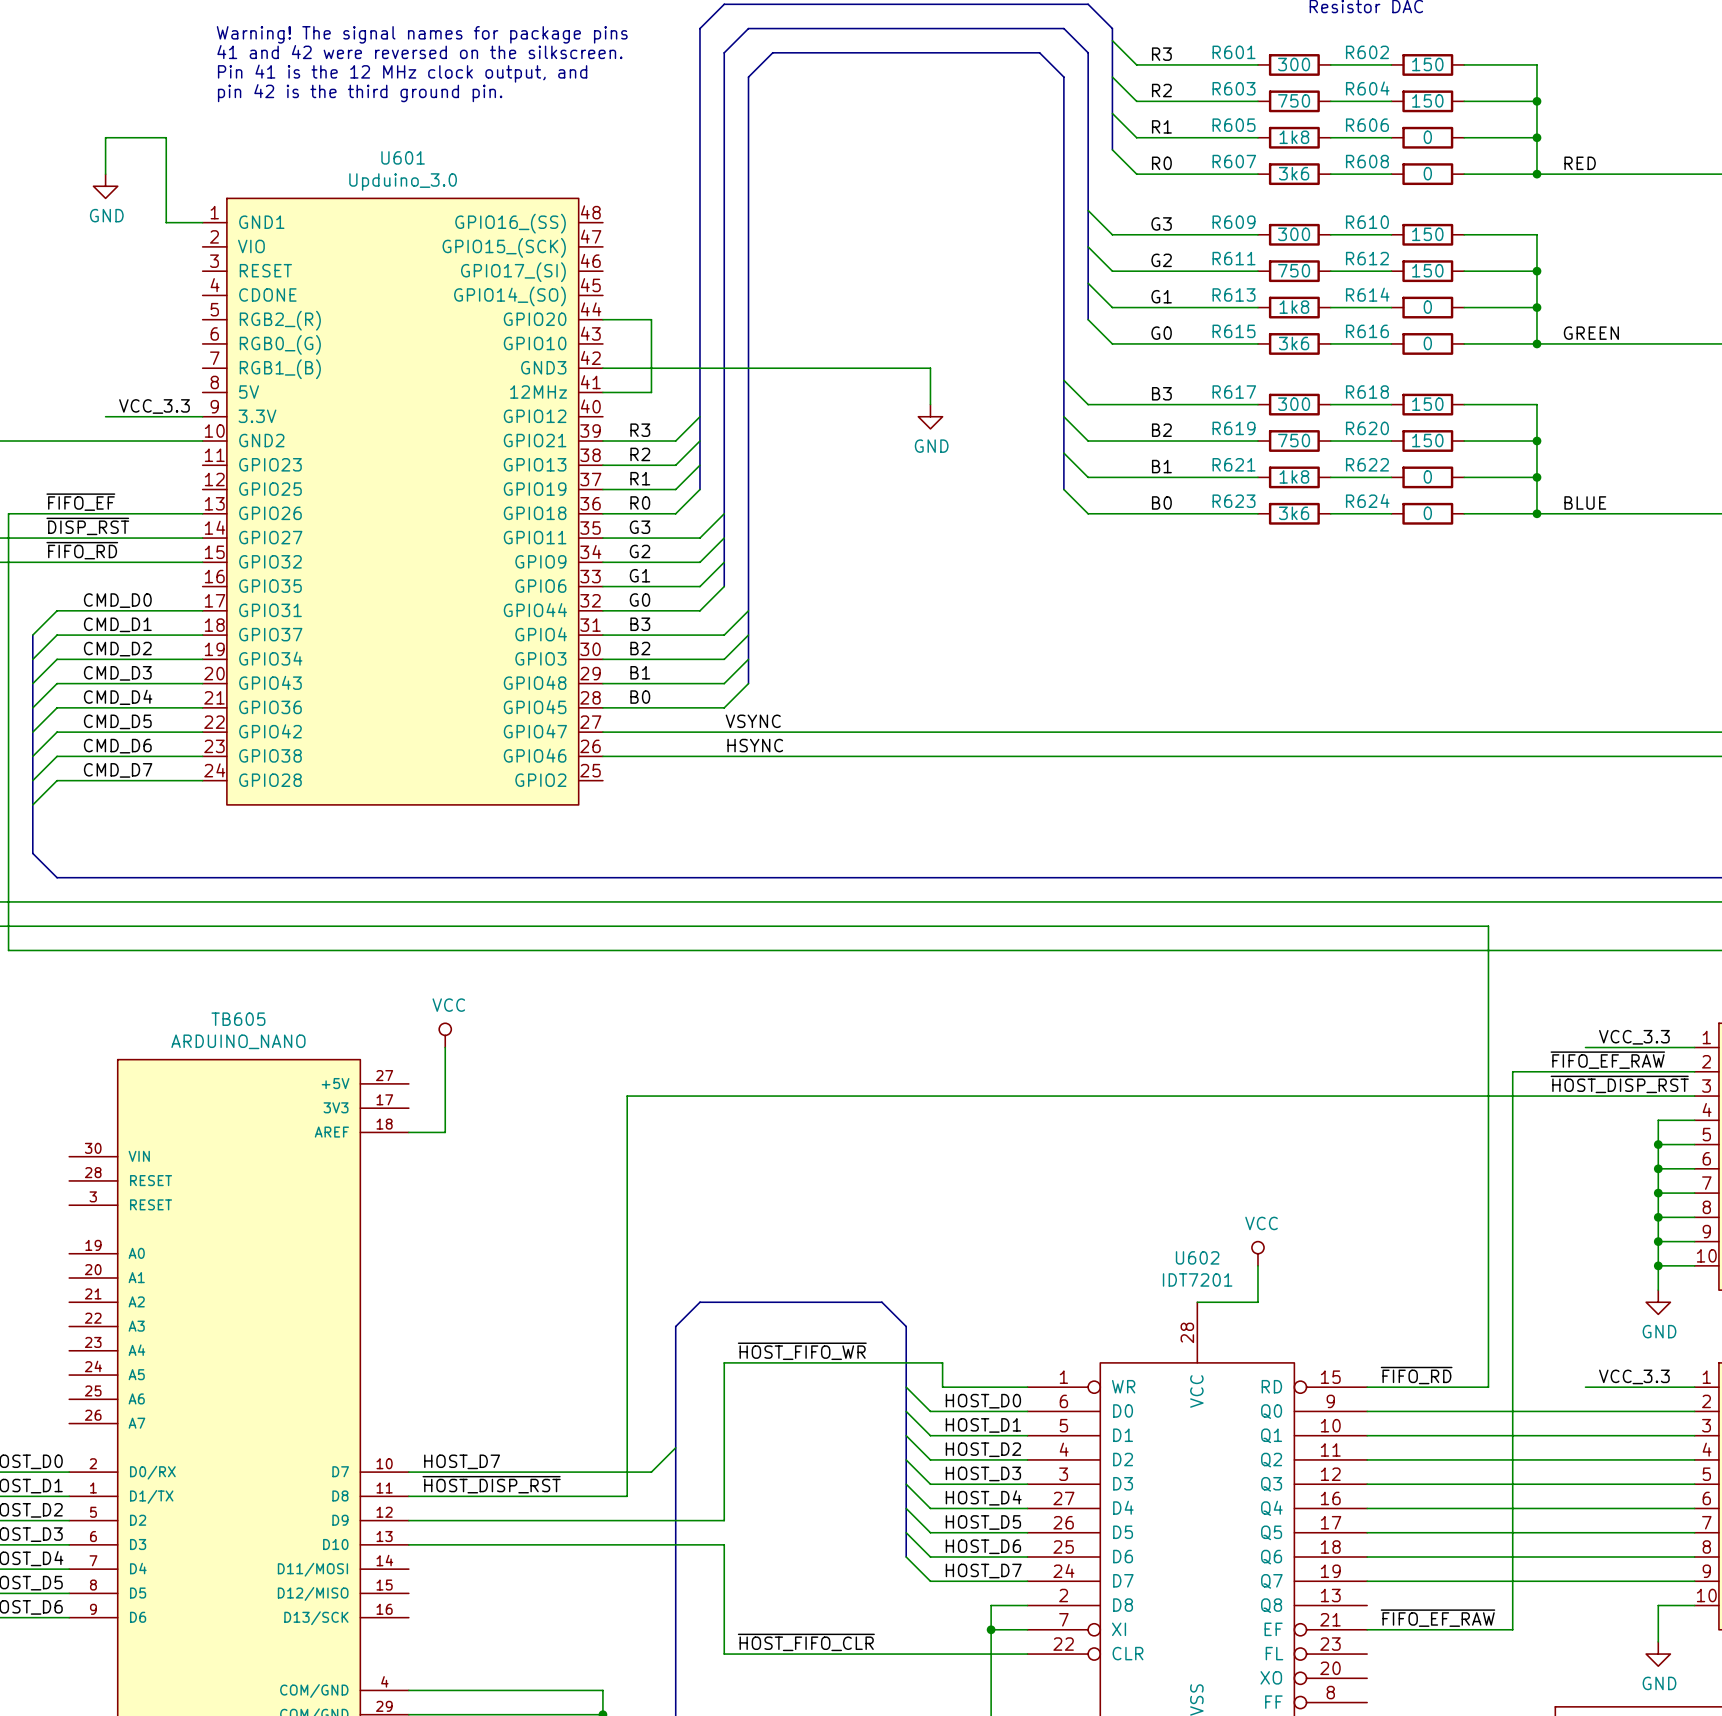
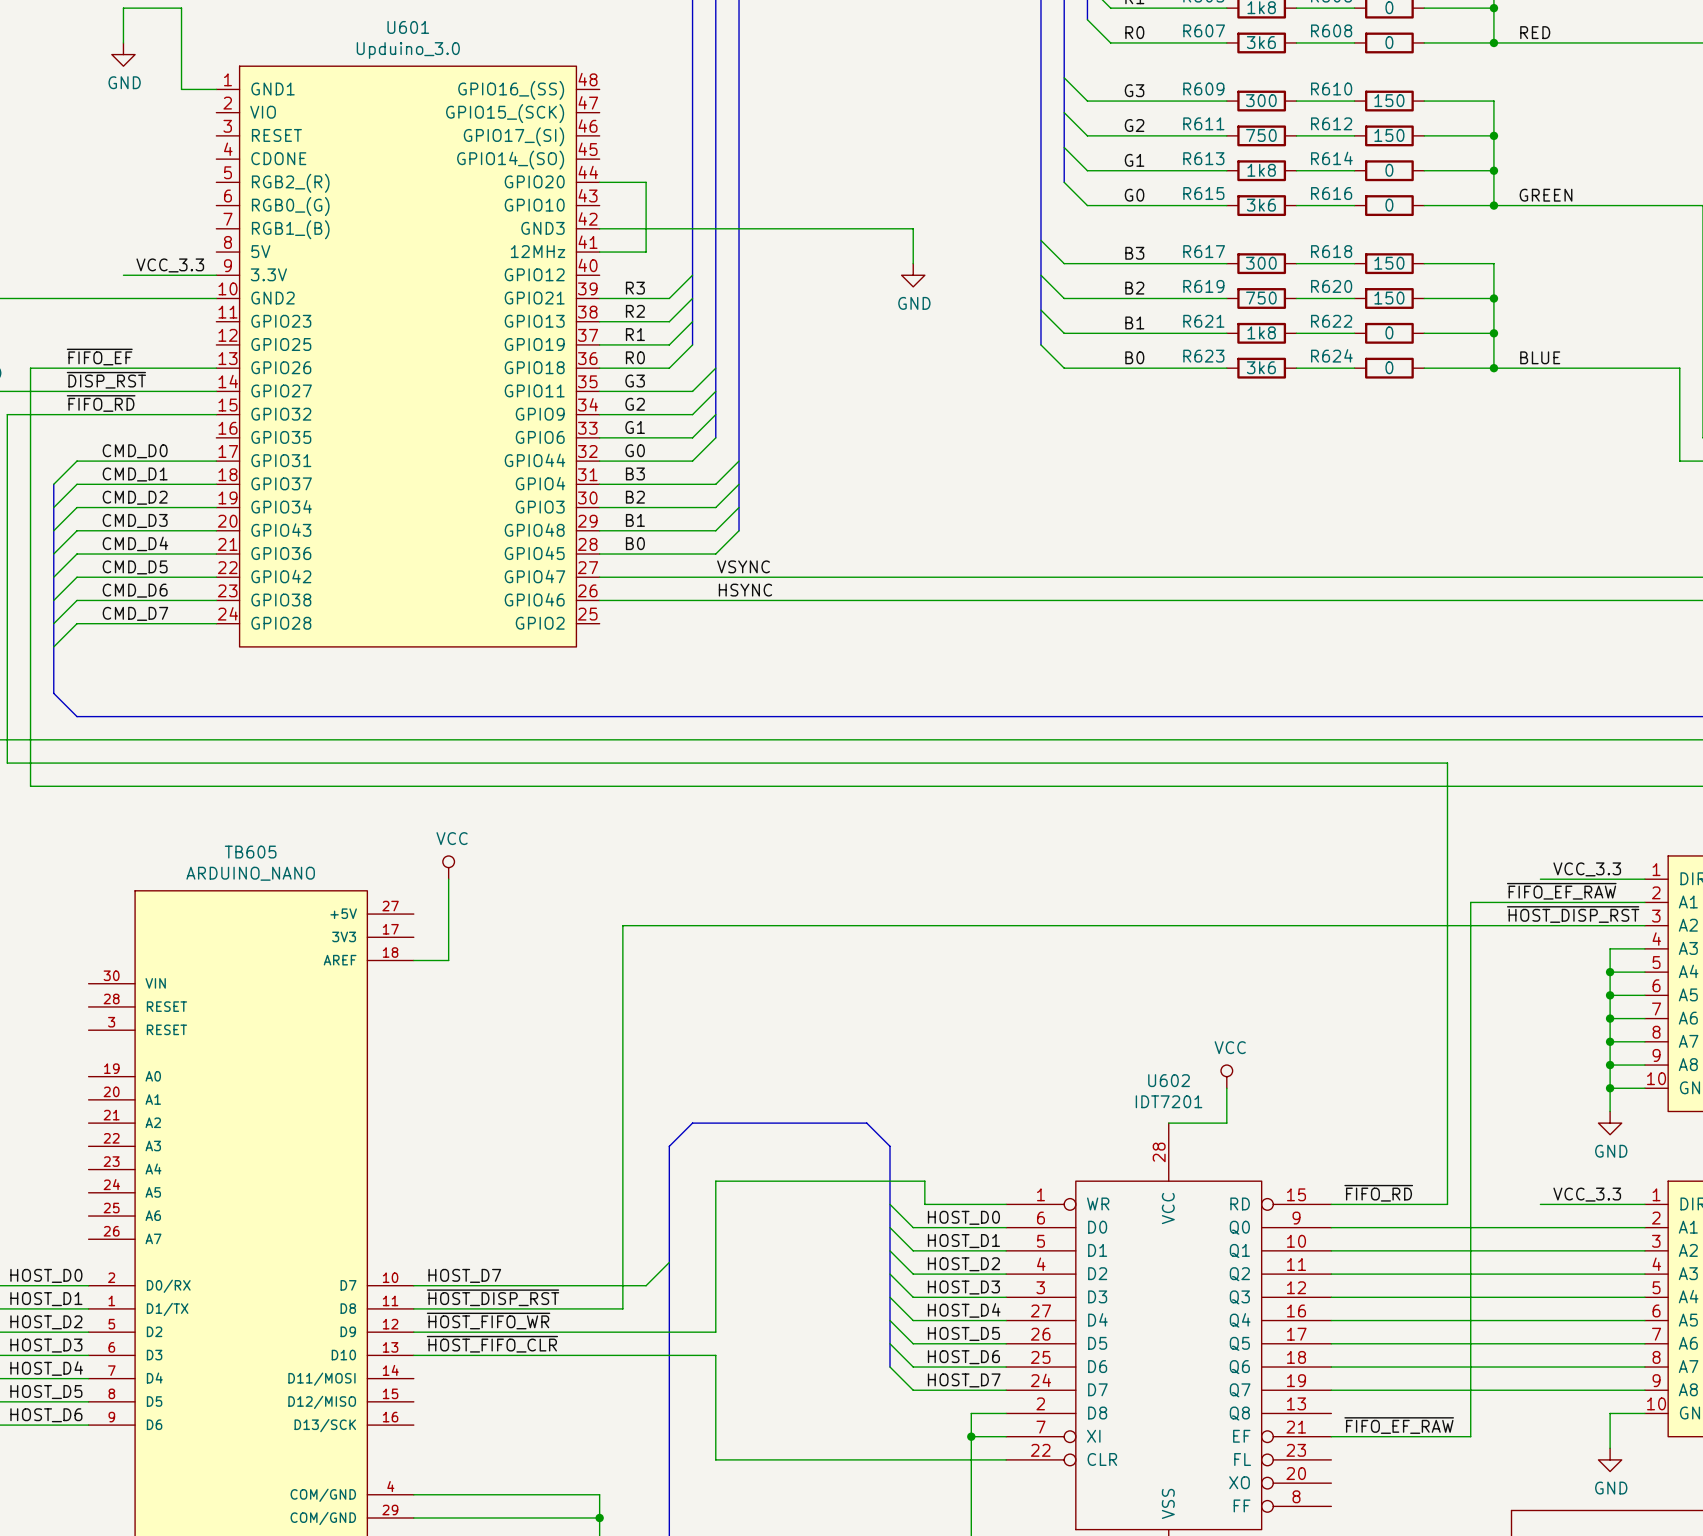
label: ~{HOST_FIFO_WR} (802, 1351) -> none
label: none -> ~{HOST_FIFO_WR} (488, 1321)
label: none -> ~{HOST_FIFO_CLR} (492, 1344)
label: ~{HOST_FIFO_CLR} (806, 1642) -> none

